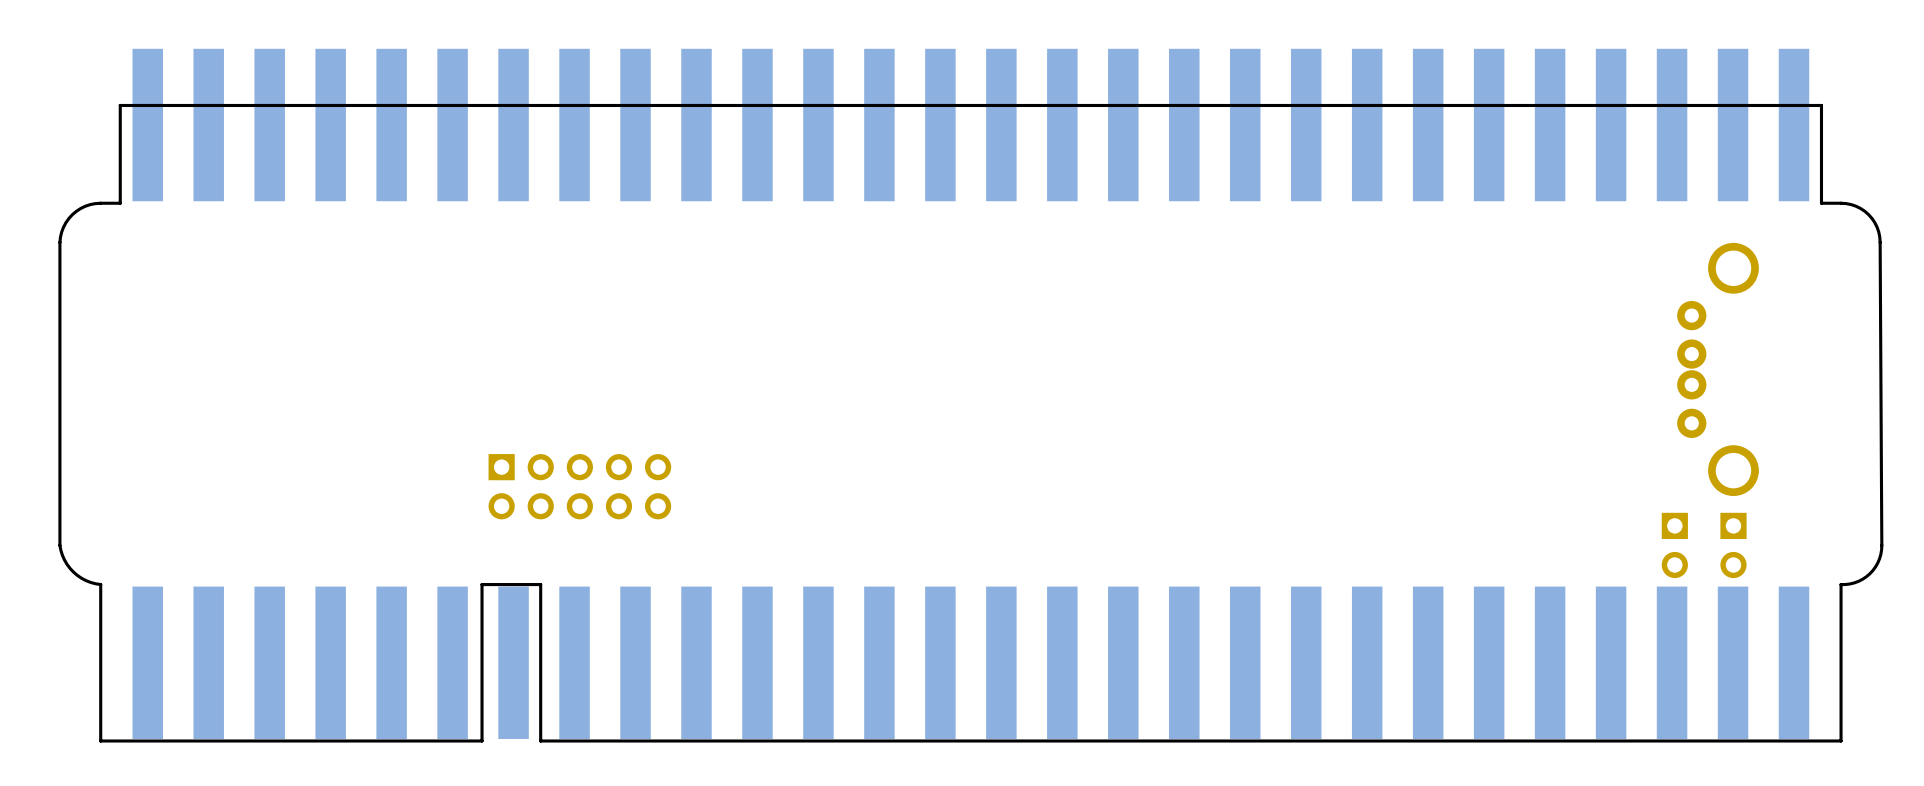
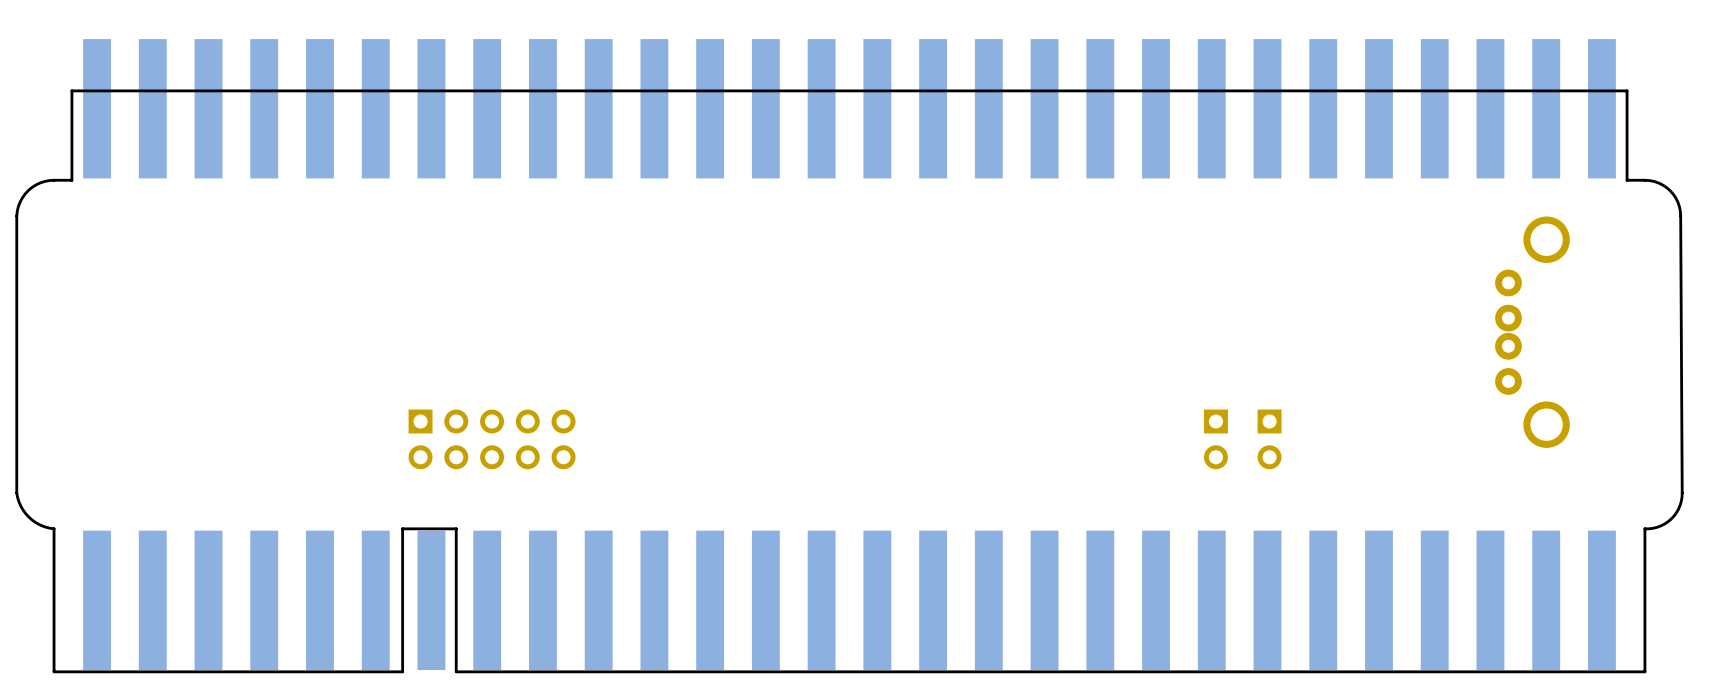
part: none -> (1215, 439)
part: none -> (1269, 439)
part: (1674, 545) -> none
part: (1733, 545) -> none

